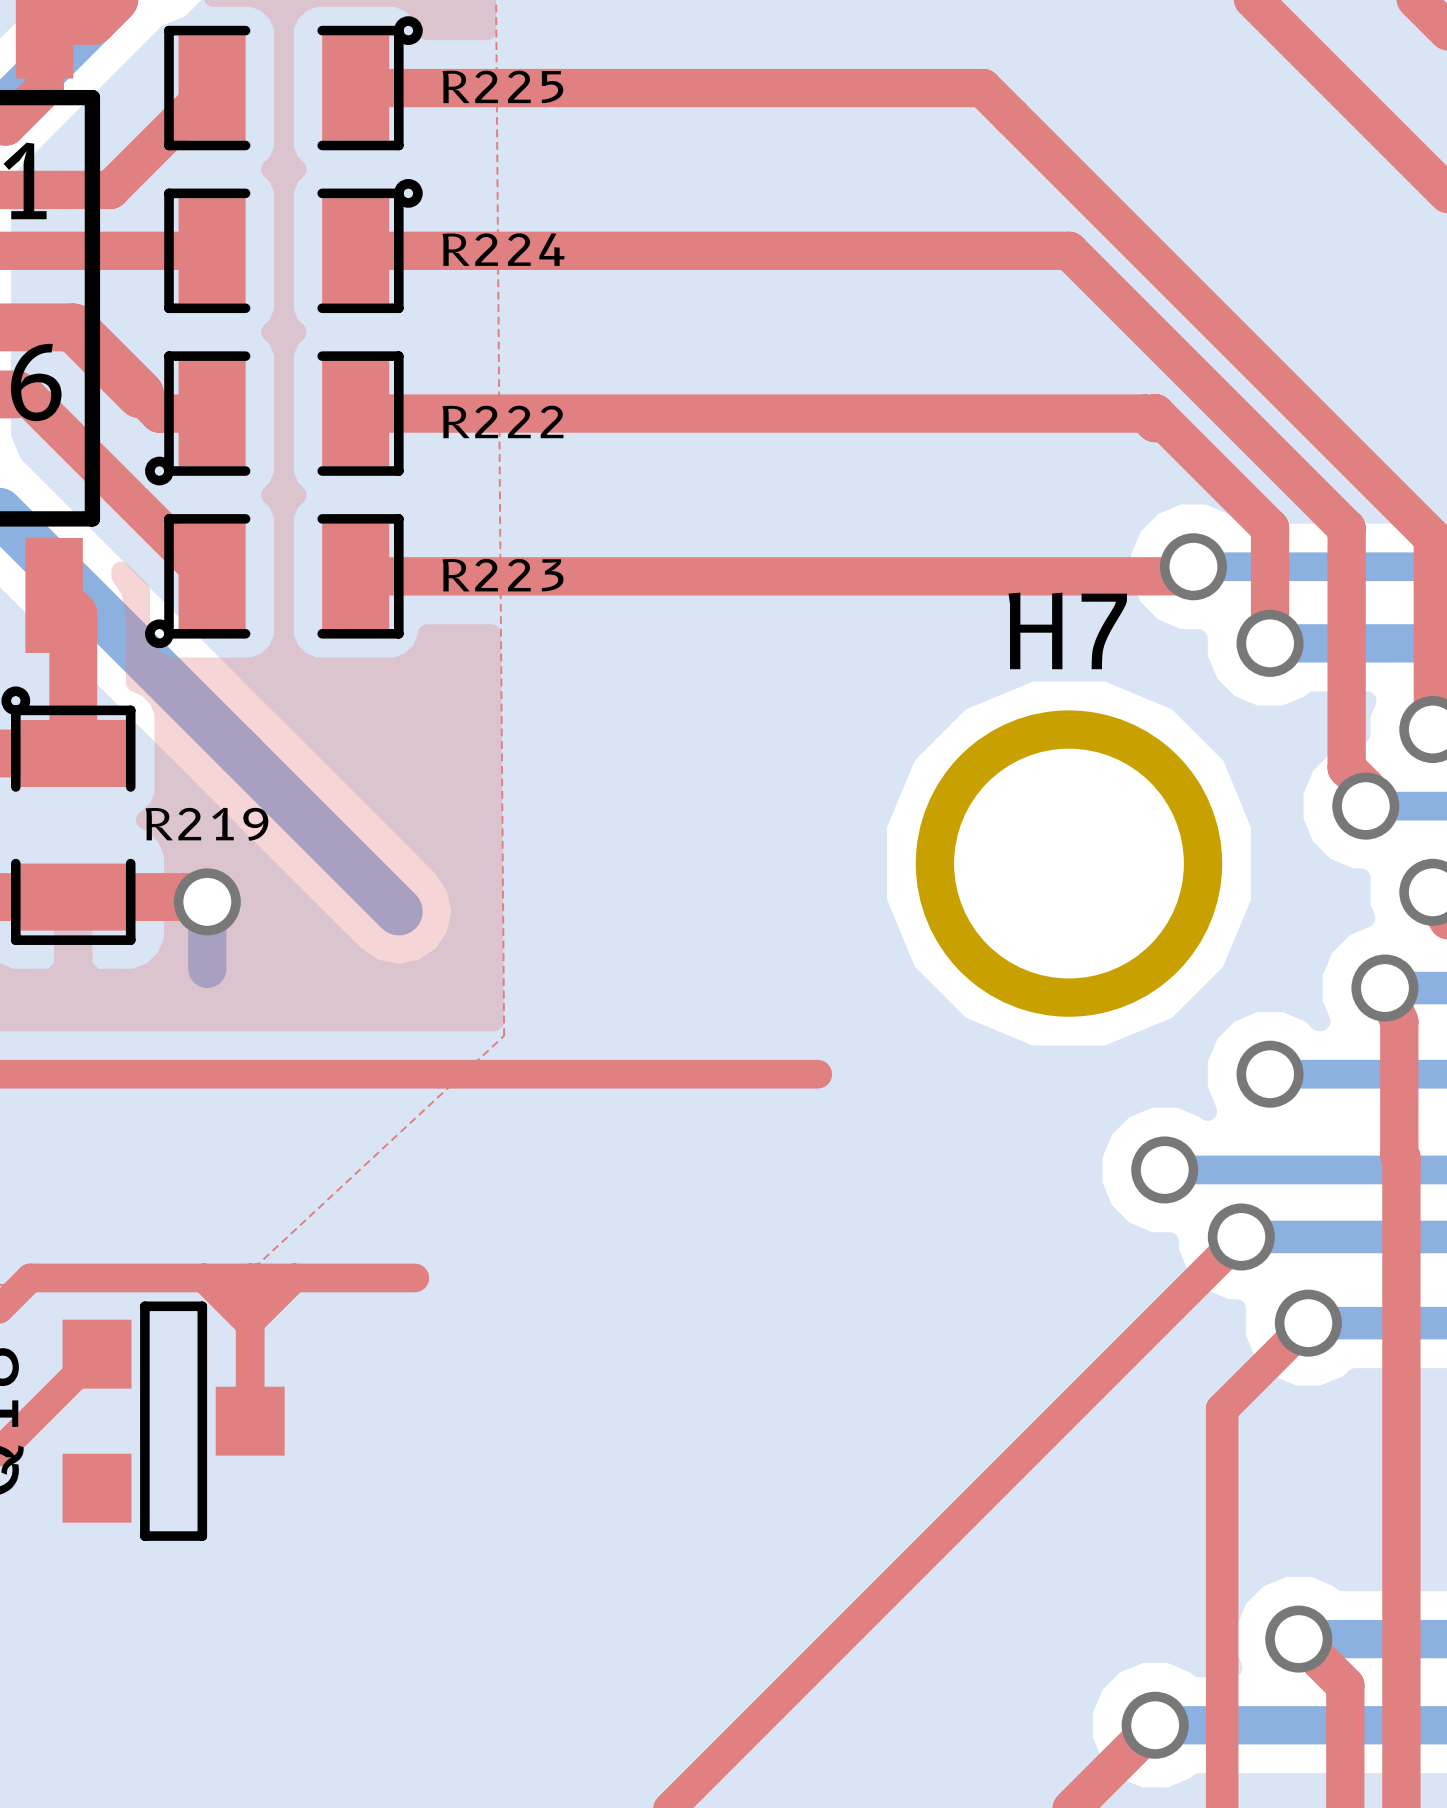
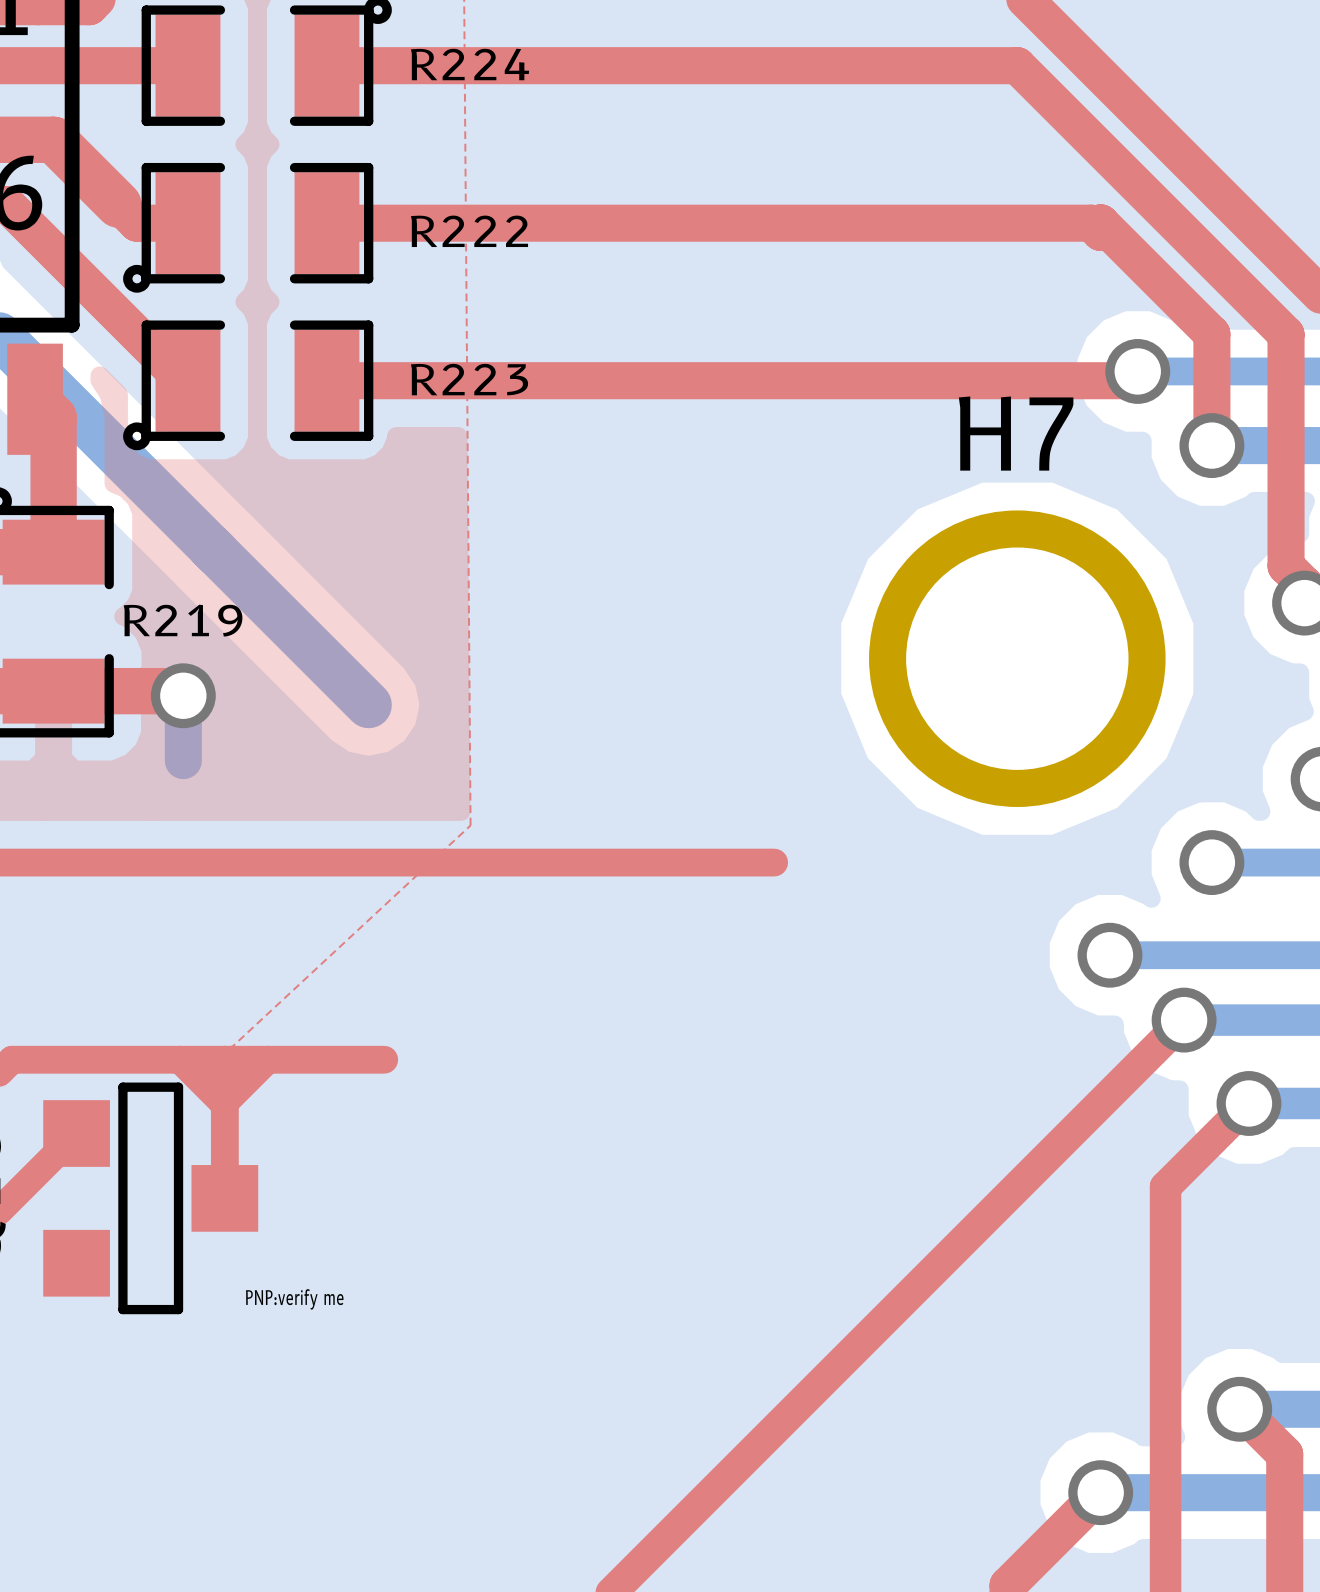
text: none -> PNP:verify me (294, 1299)

